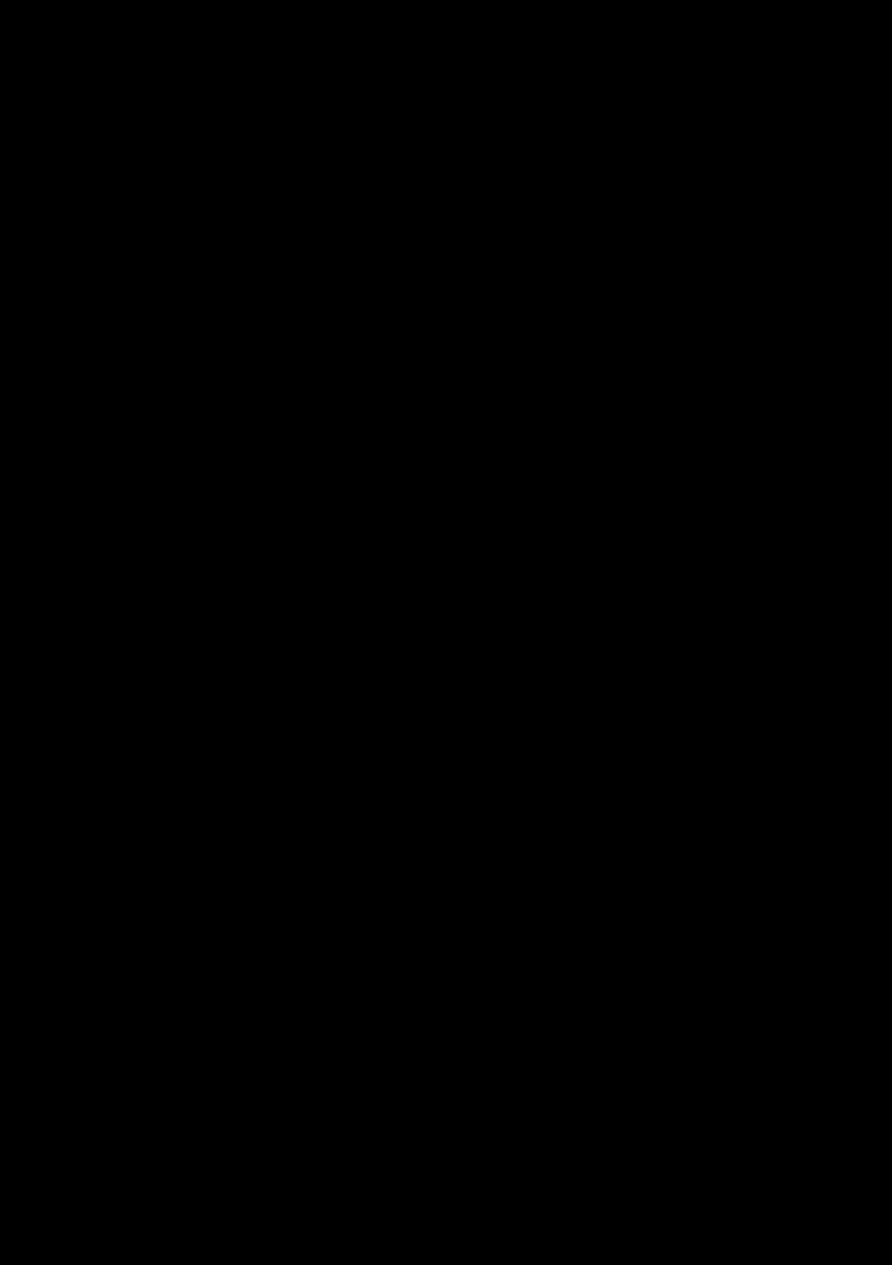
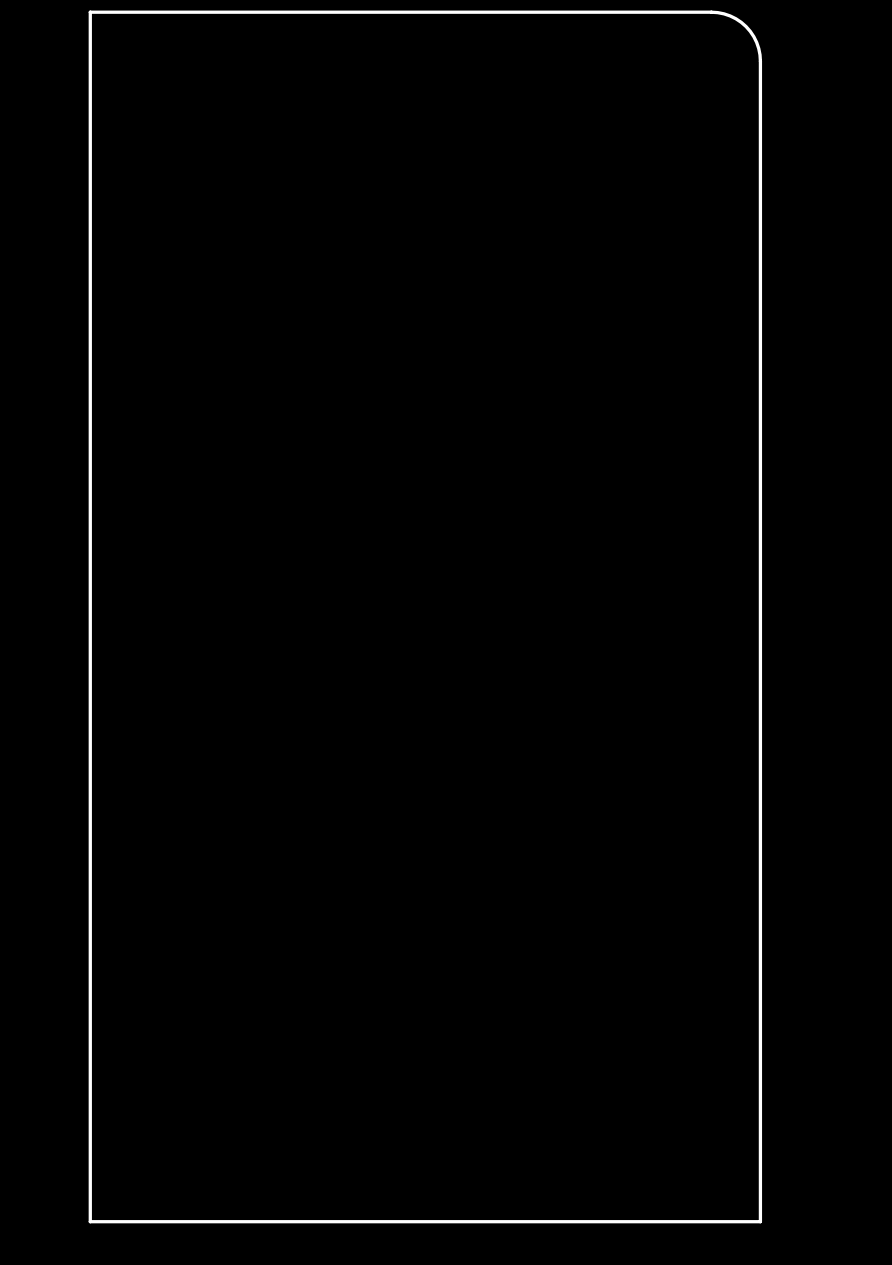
board edge: none -> (90, 12) (90, 1221) (760, 1221) (760, 61) (758, 48) (753, 36) (746, 26) (735, 18) (724, 13) (711, 12) (90, 12)

